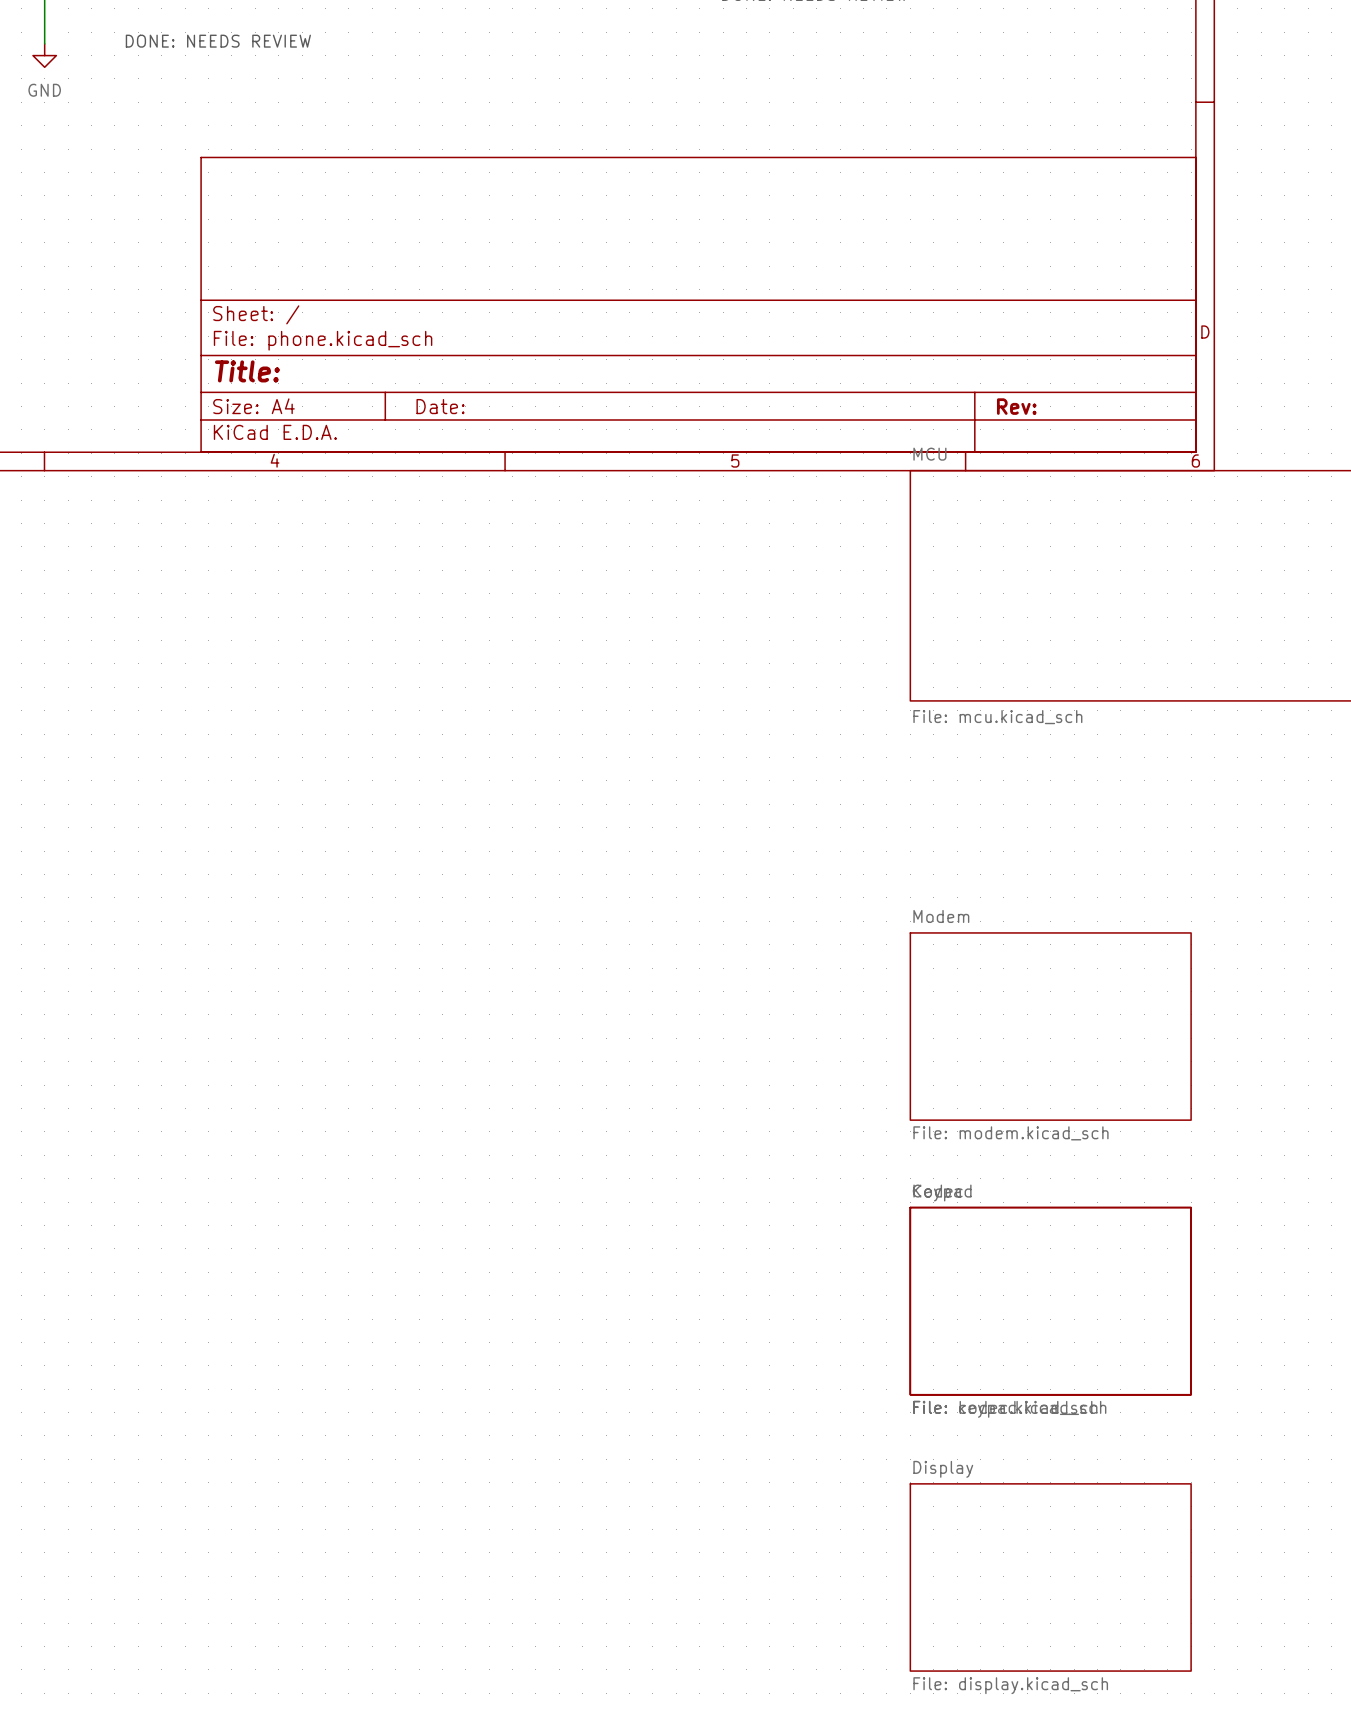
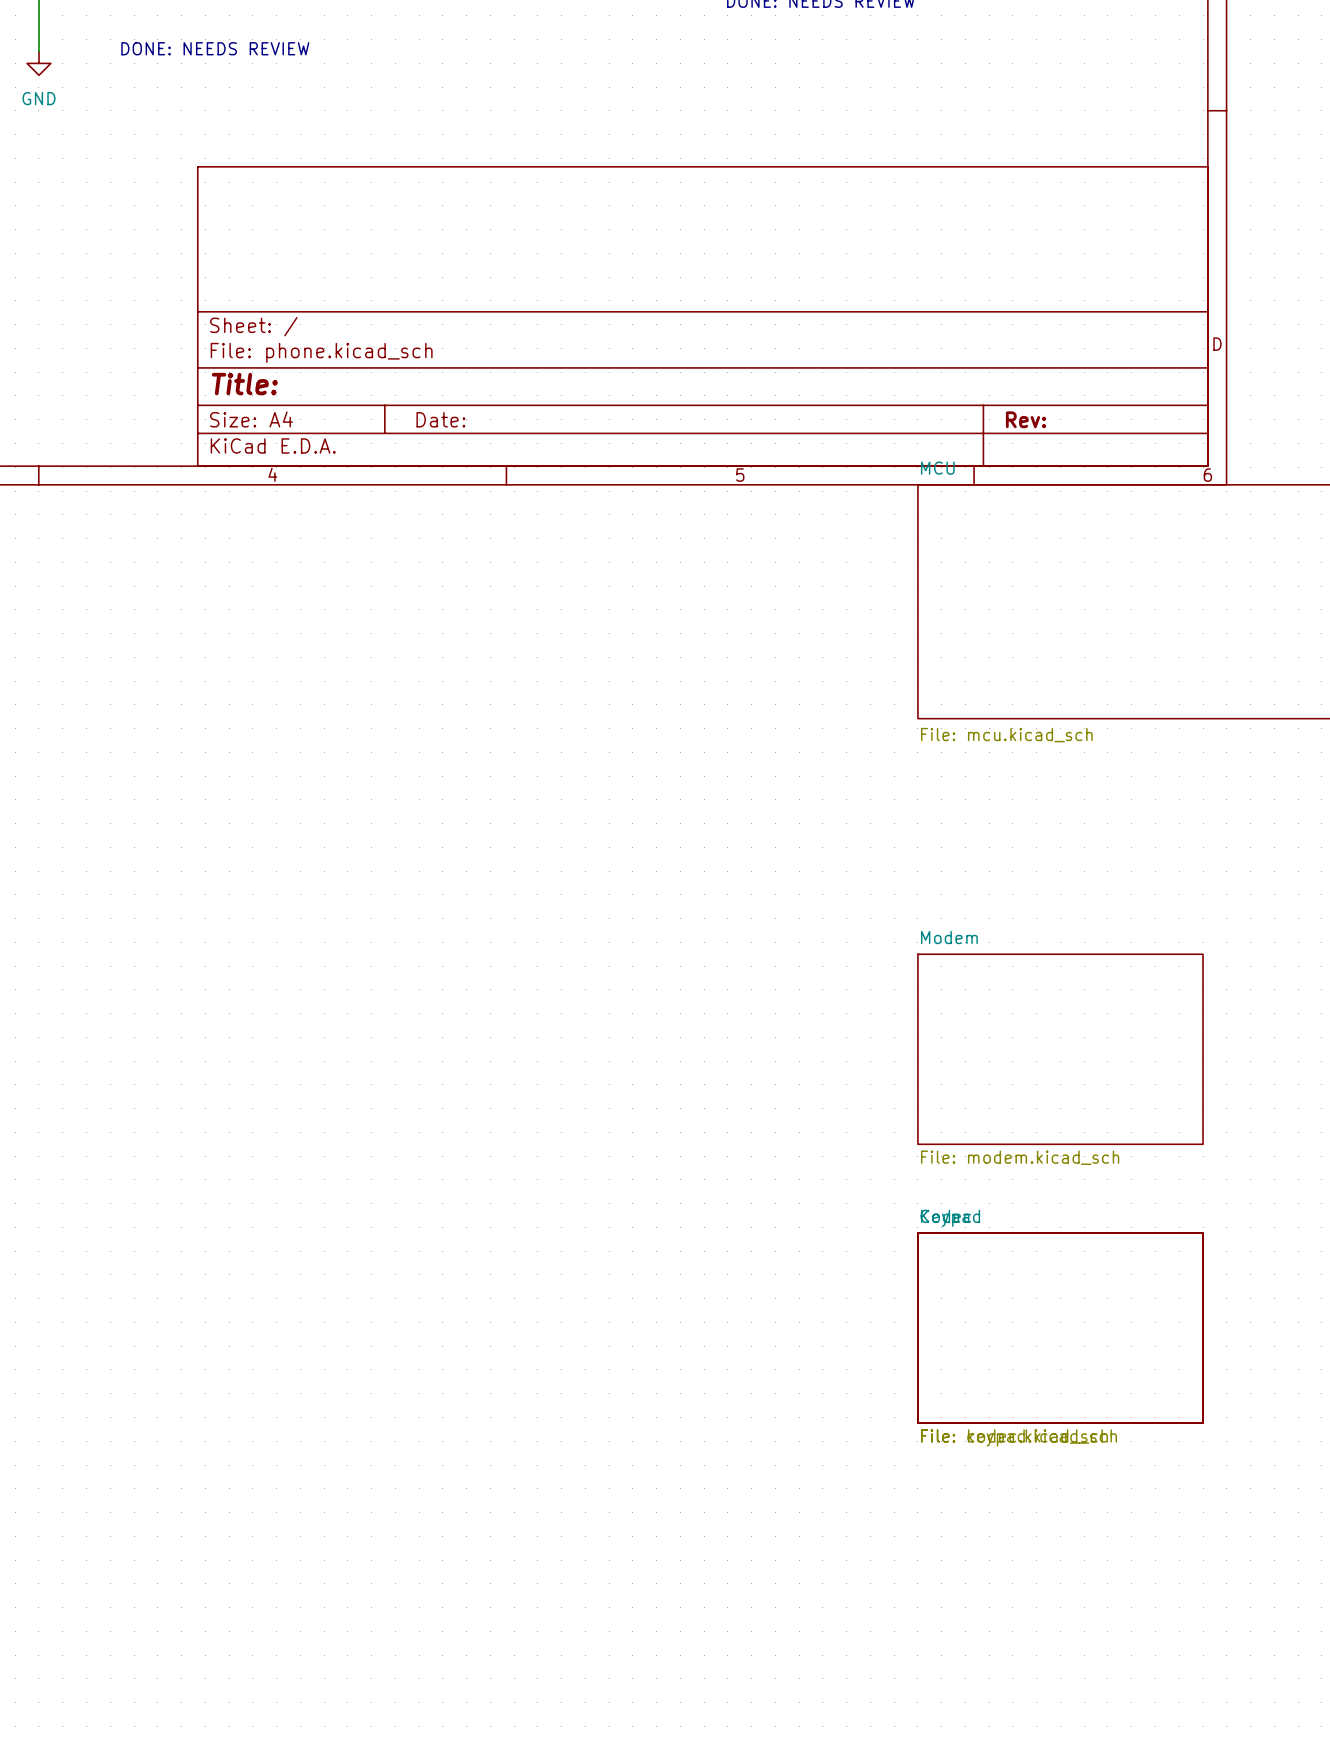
sheet Display: File: display.kicad_sch (1050, 1577) -> none

